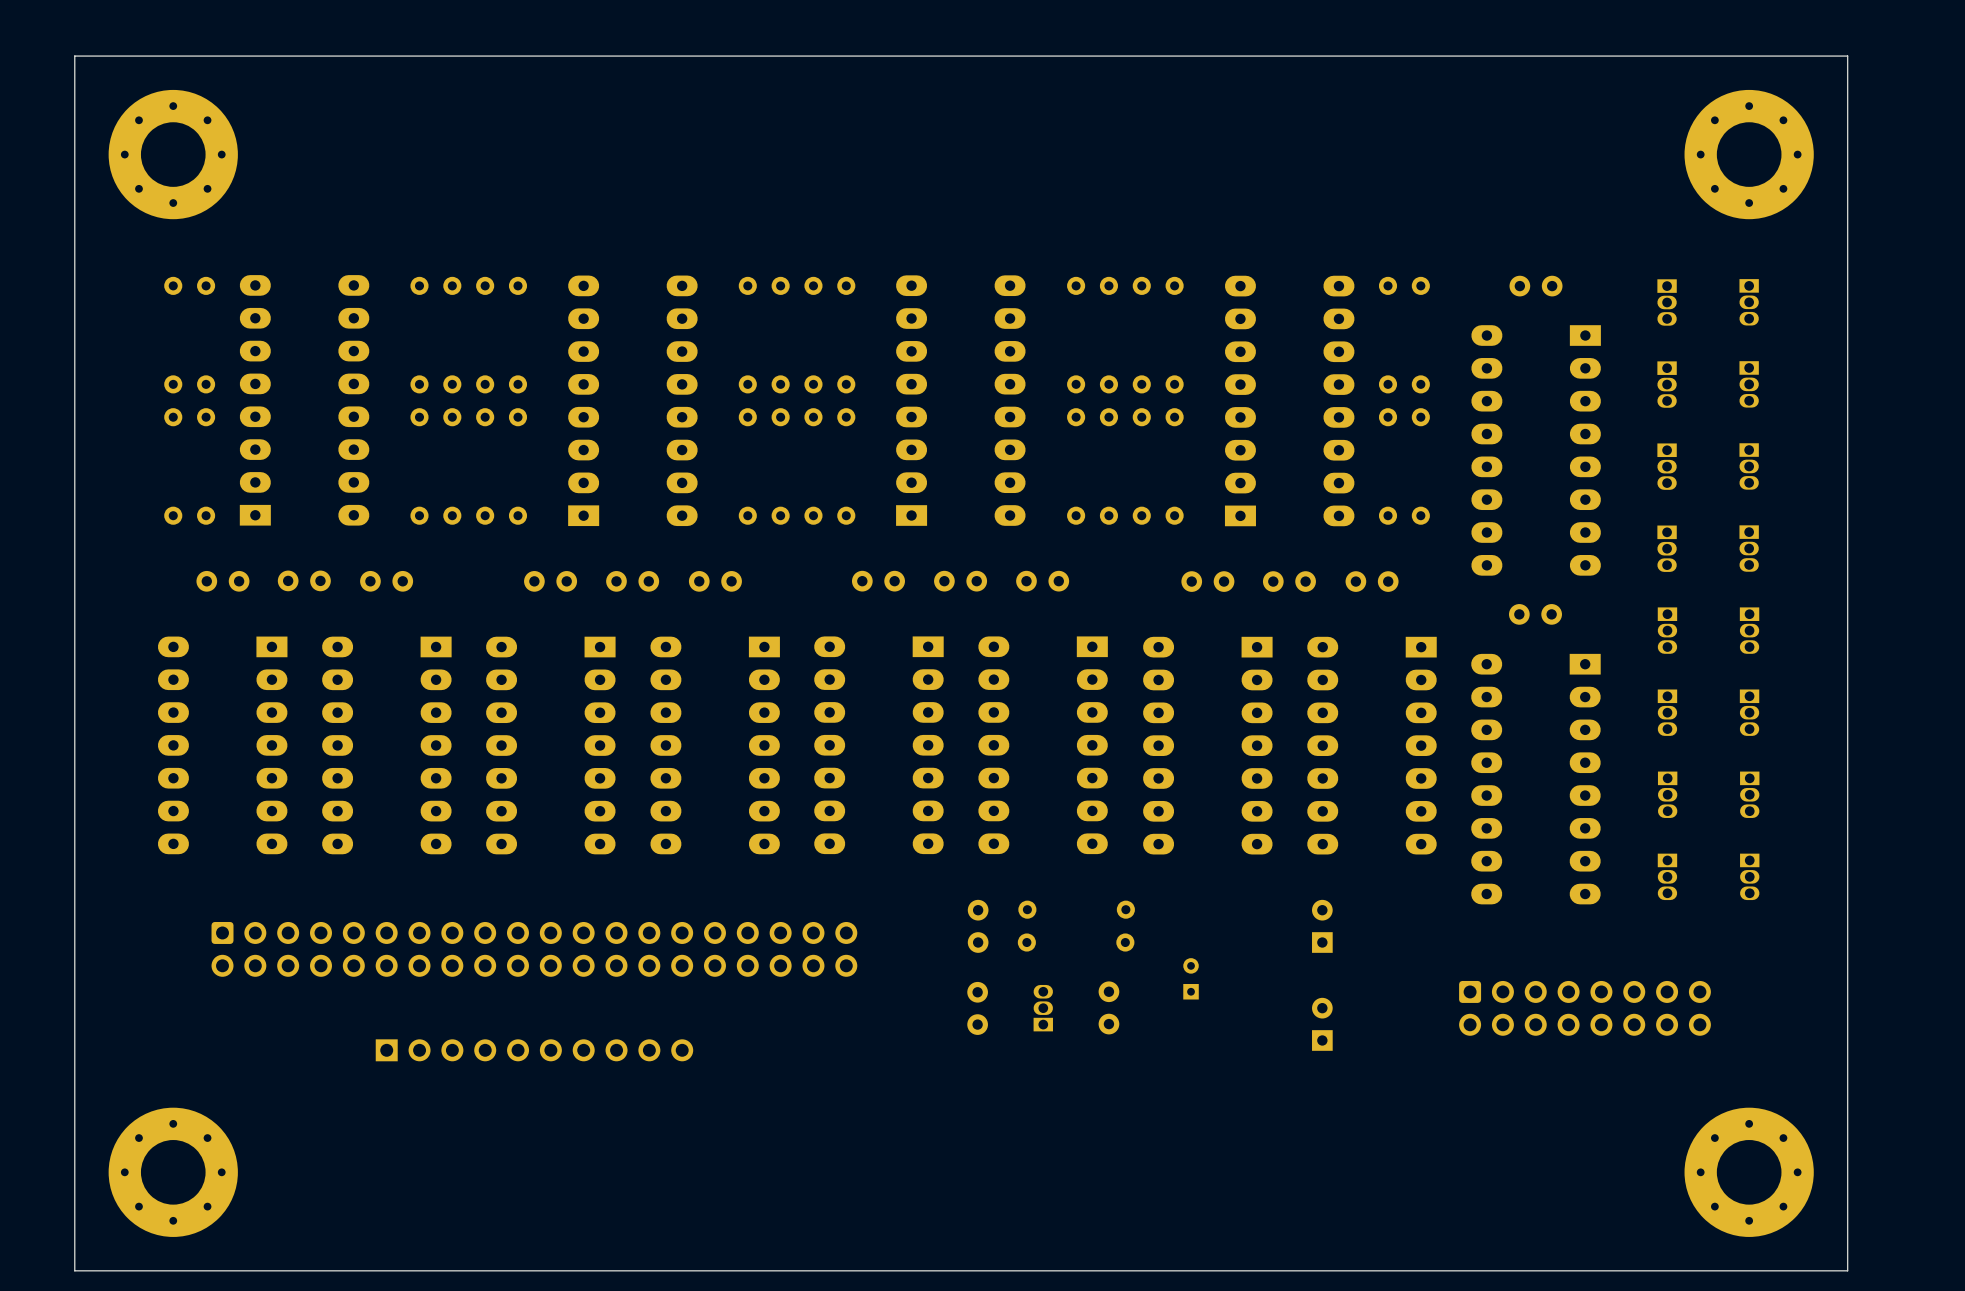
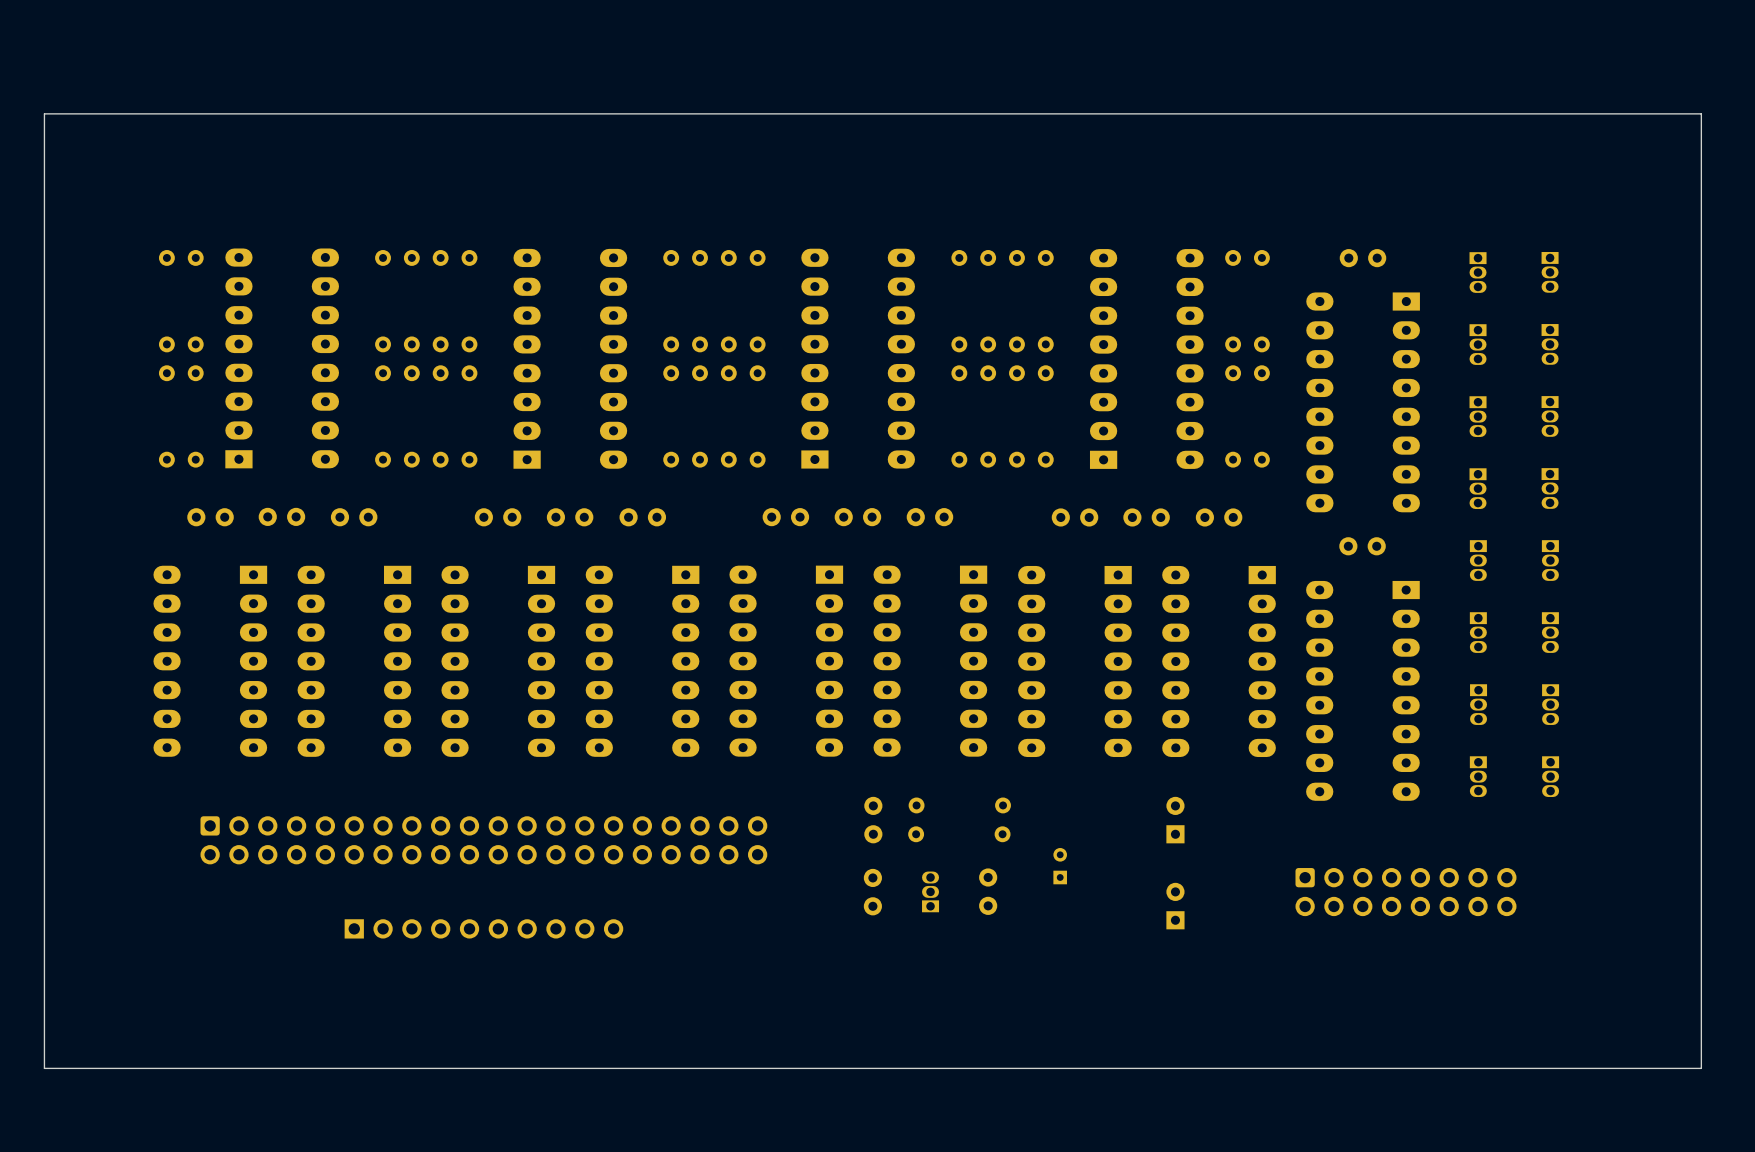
board edge: (1847, 56) (74, 56) (74, 1270) (1847, 1270) (1847, 56) -> (1701, 113) (1701, 1068) (44, 1068) (44, 113) (1701, 113)
part: (173, 154) -> none
part: (1749, 154) -> none
part: (173, 1172) -> none
part: (1749, 1172) -> none

